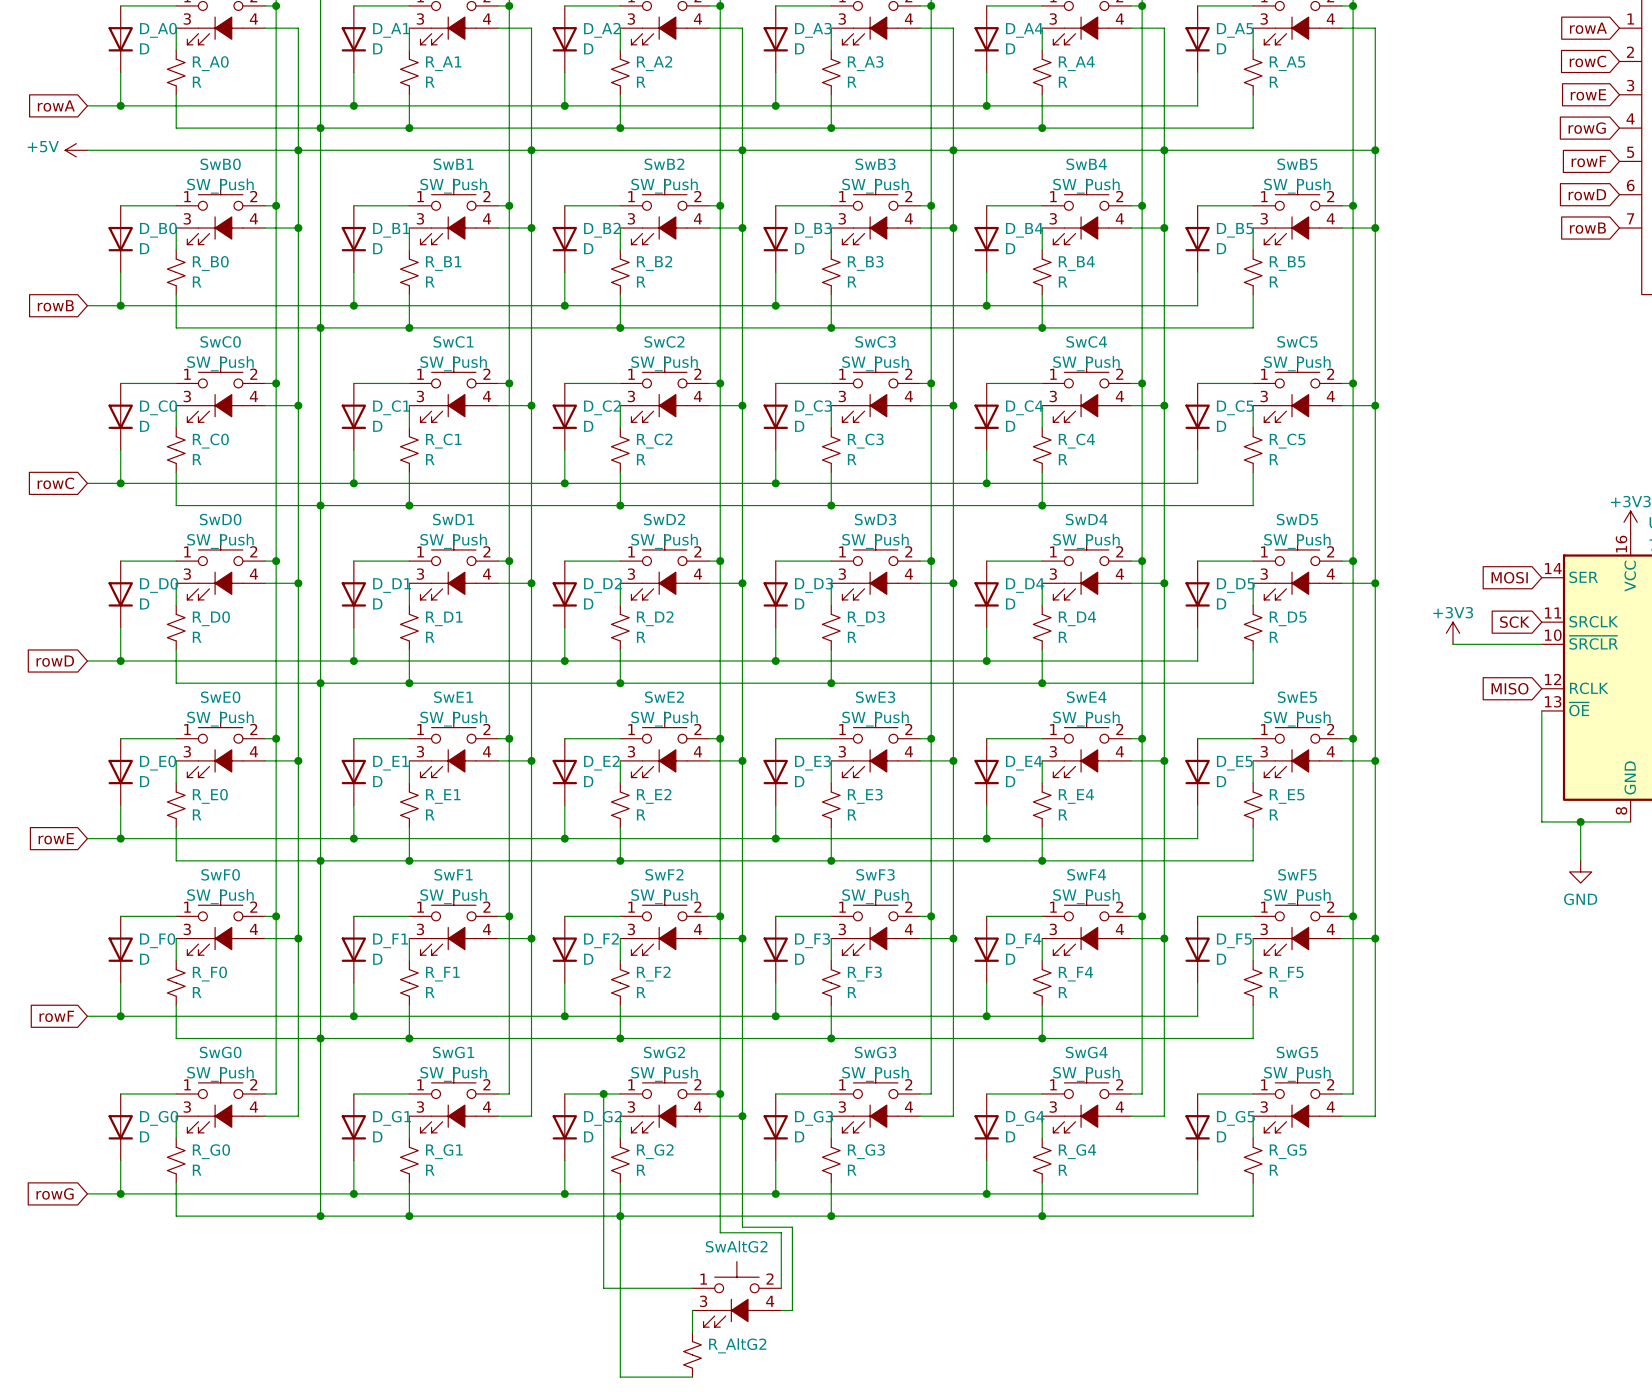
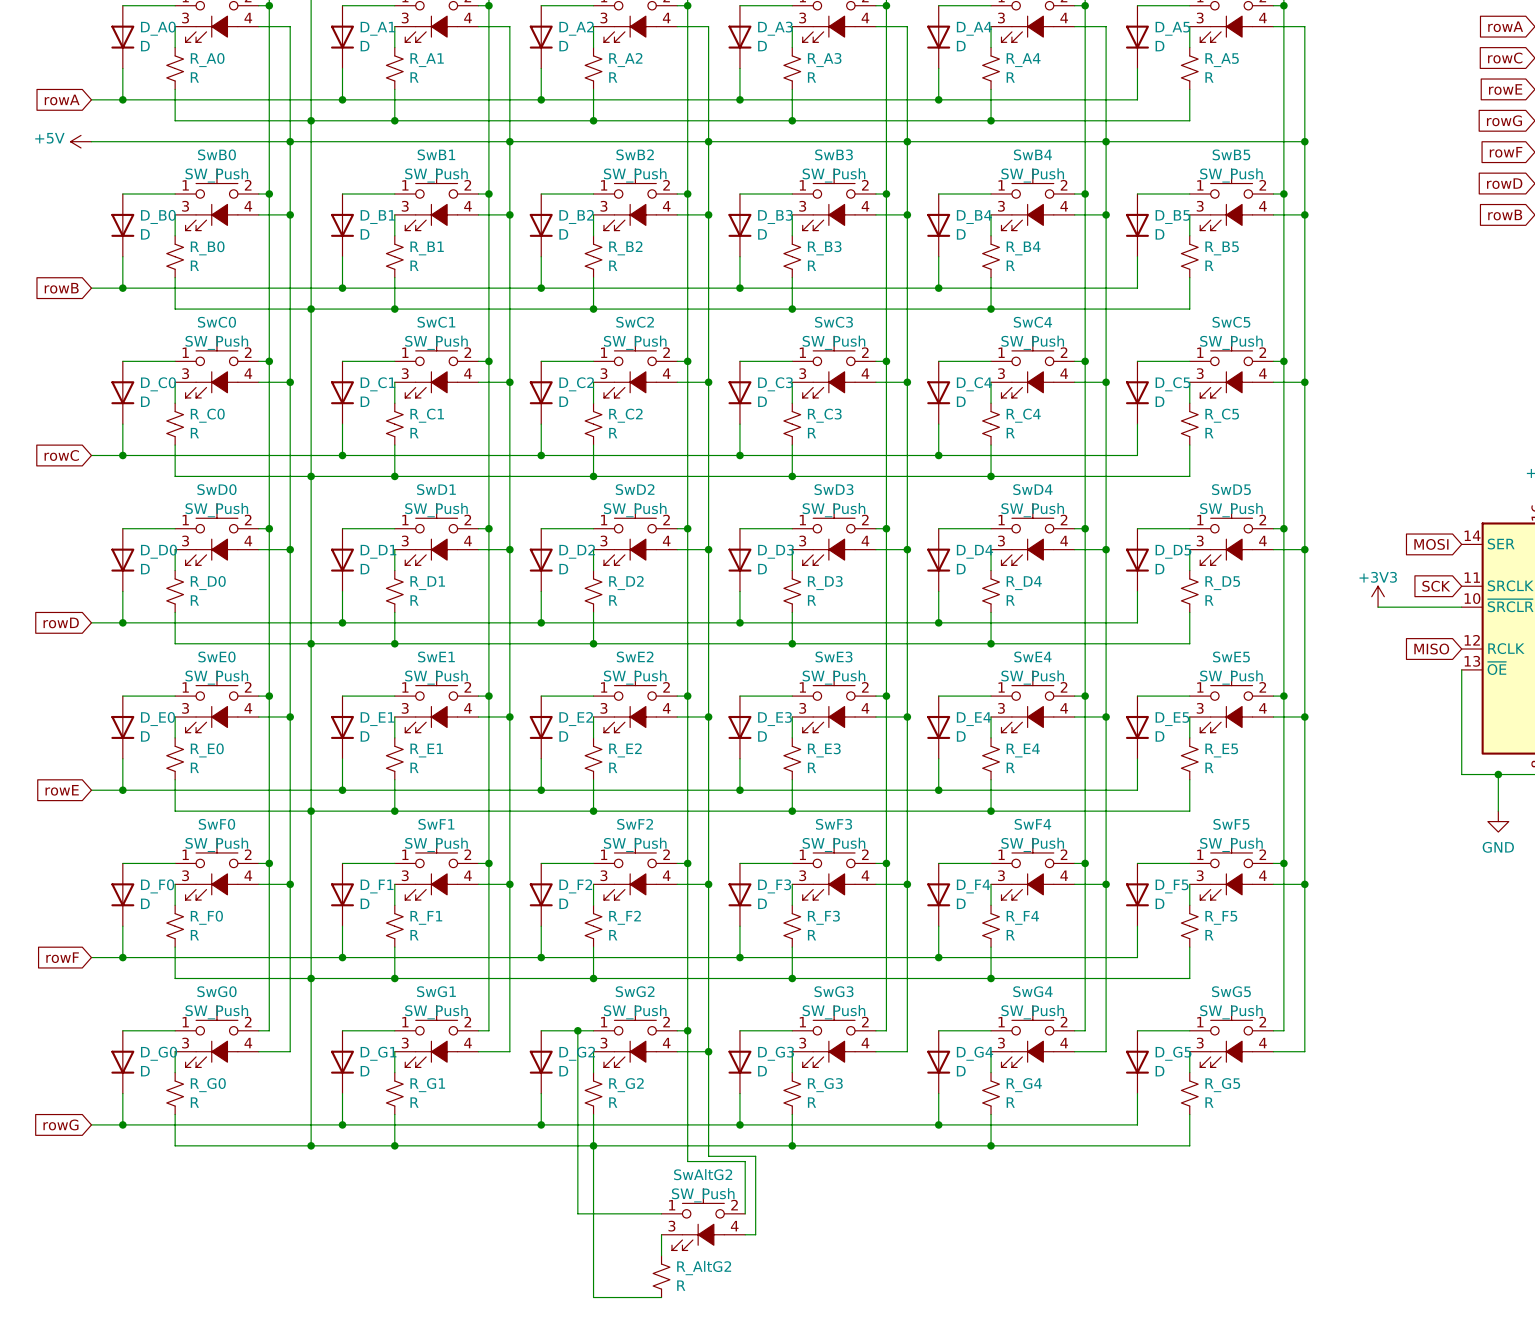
SwAltG2 value: none -> SW_Push (703, 1195)
R_AltG2 value: none -> R (681, 1285)

